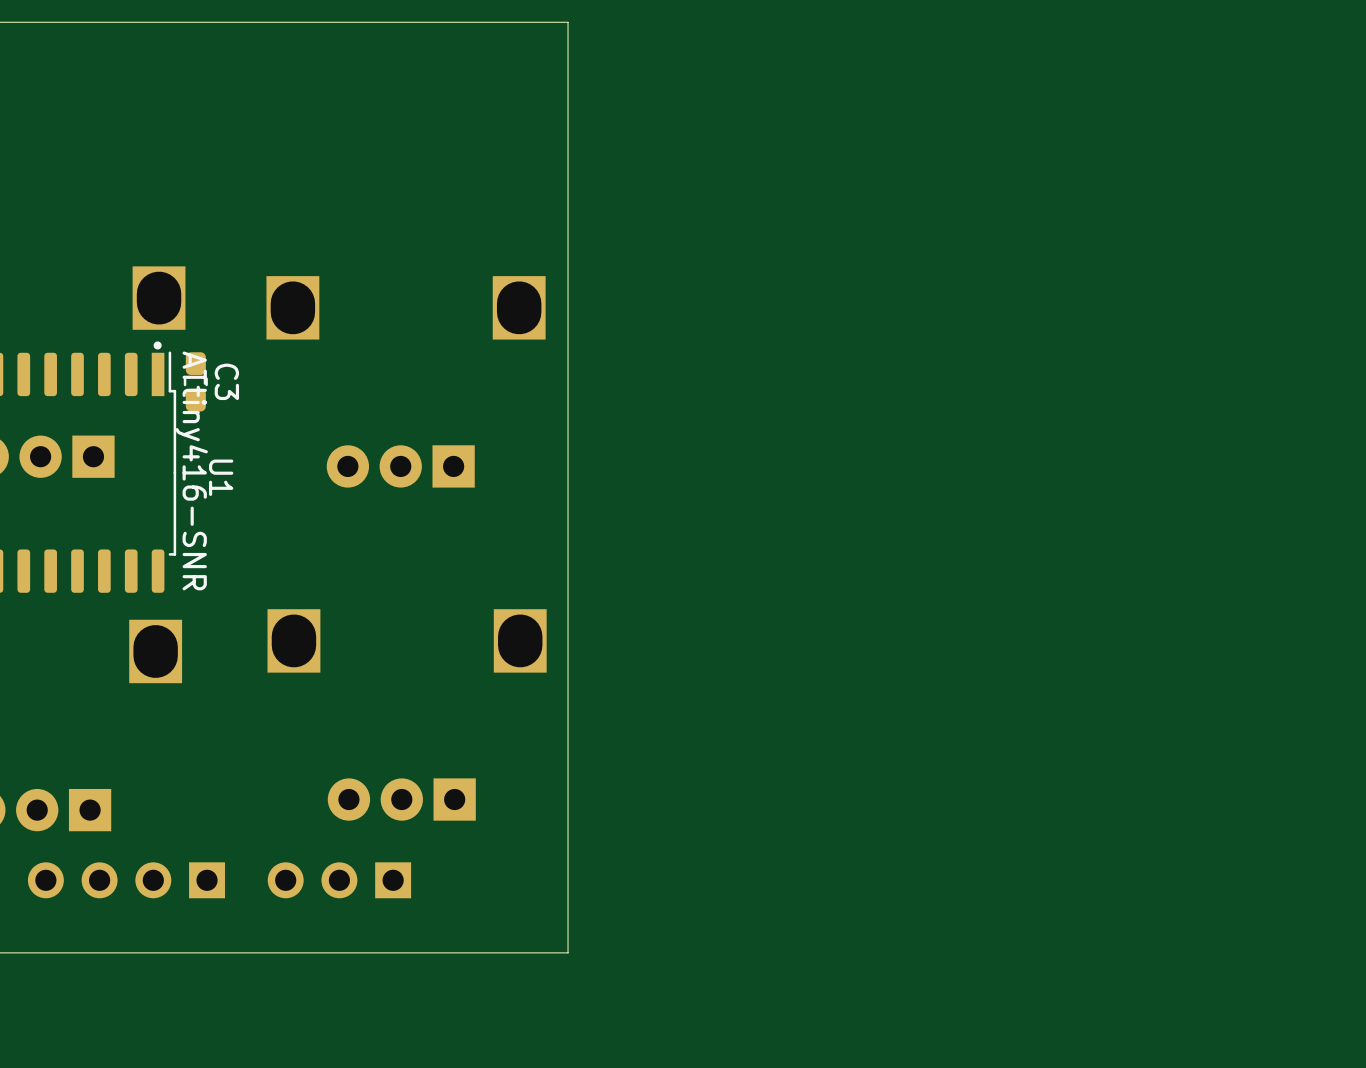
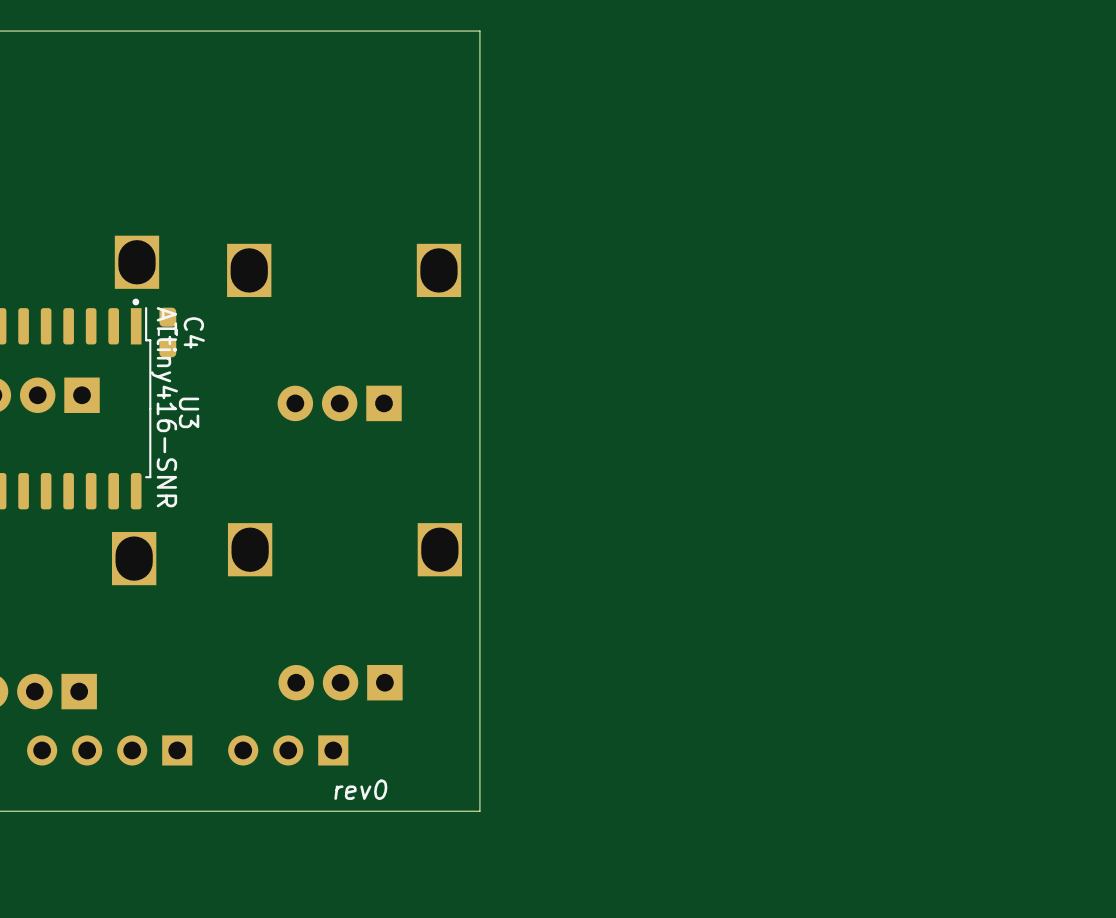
C3 name: C3 (226, 381) -> C4 (194, 332)
U1 name: U1 (221, 477) -> U3 (189, 412)
text: none -> rev0 (360, 789)

